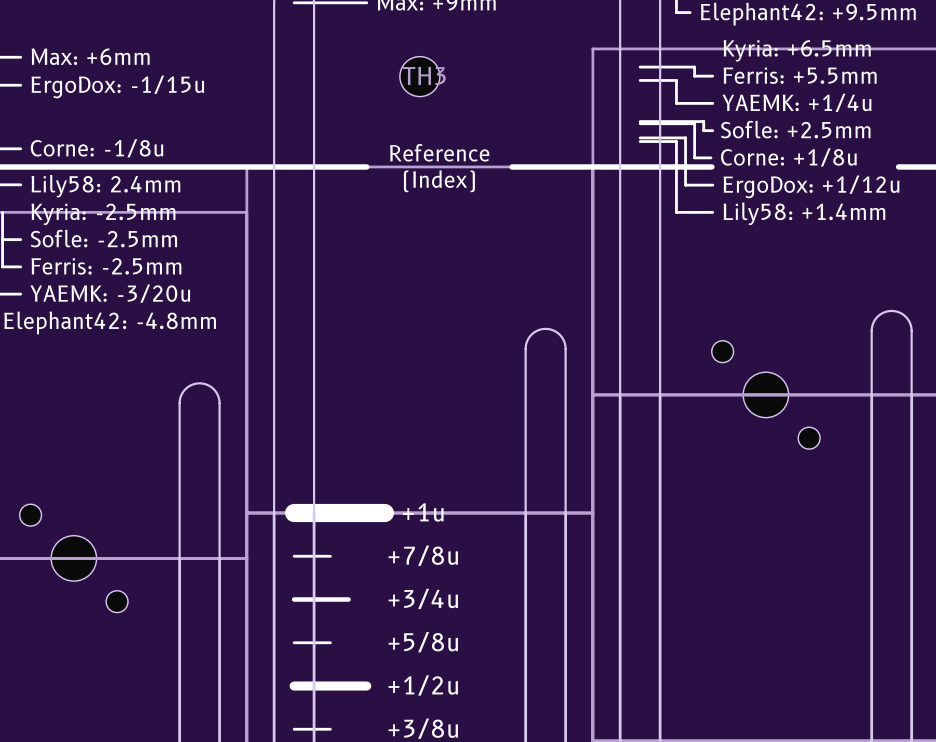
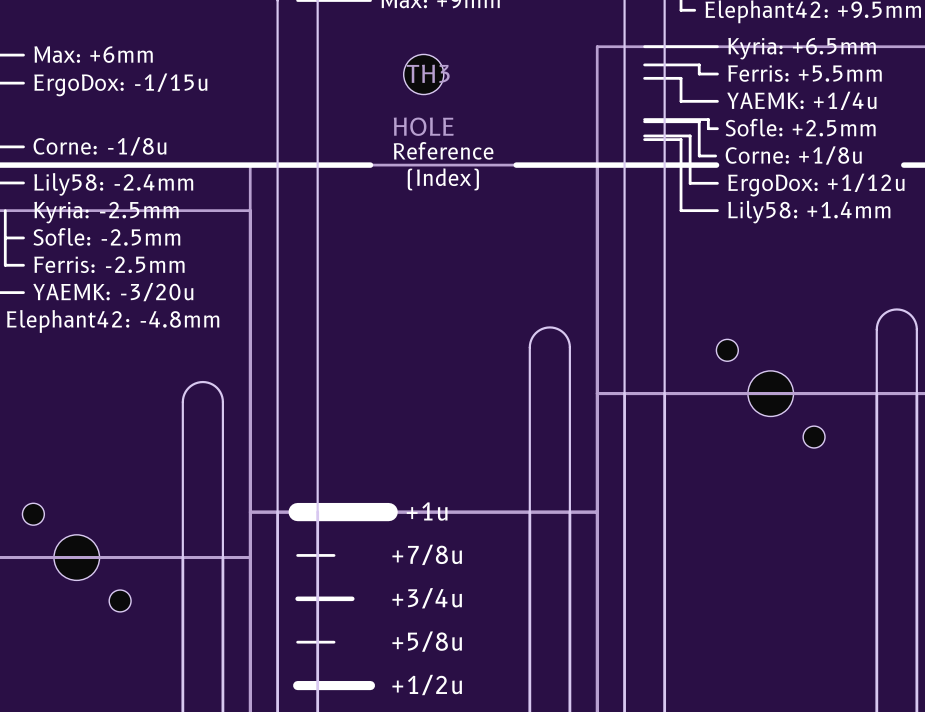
line: none -> (644, 46) (717, 46)
TH3 value: none -> HOLE (423, 126)
text: Lily58: 2.4mm (105, 186) -> Lily58: -2.4mm (113, 184)

